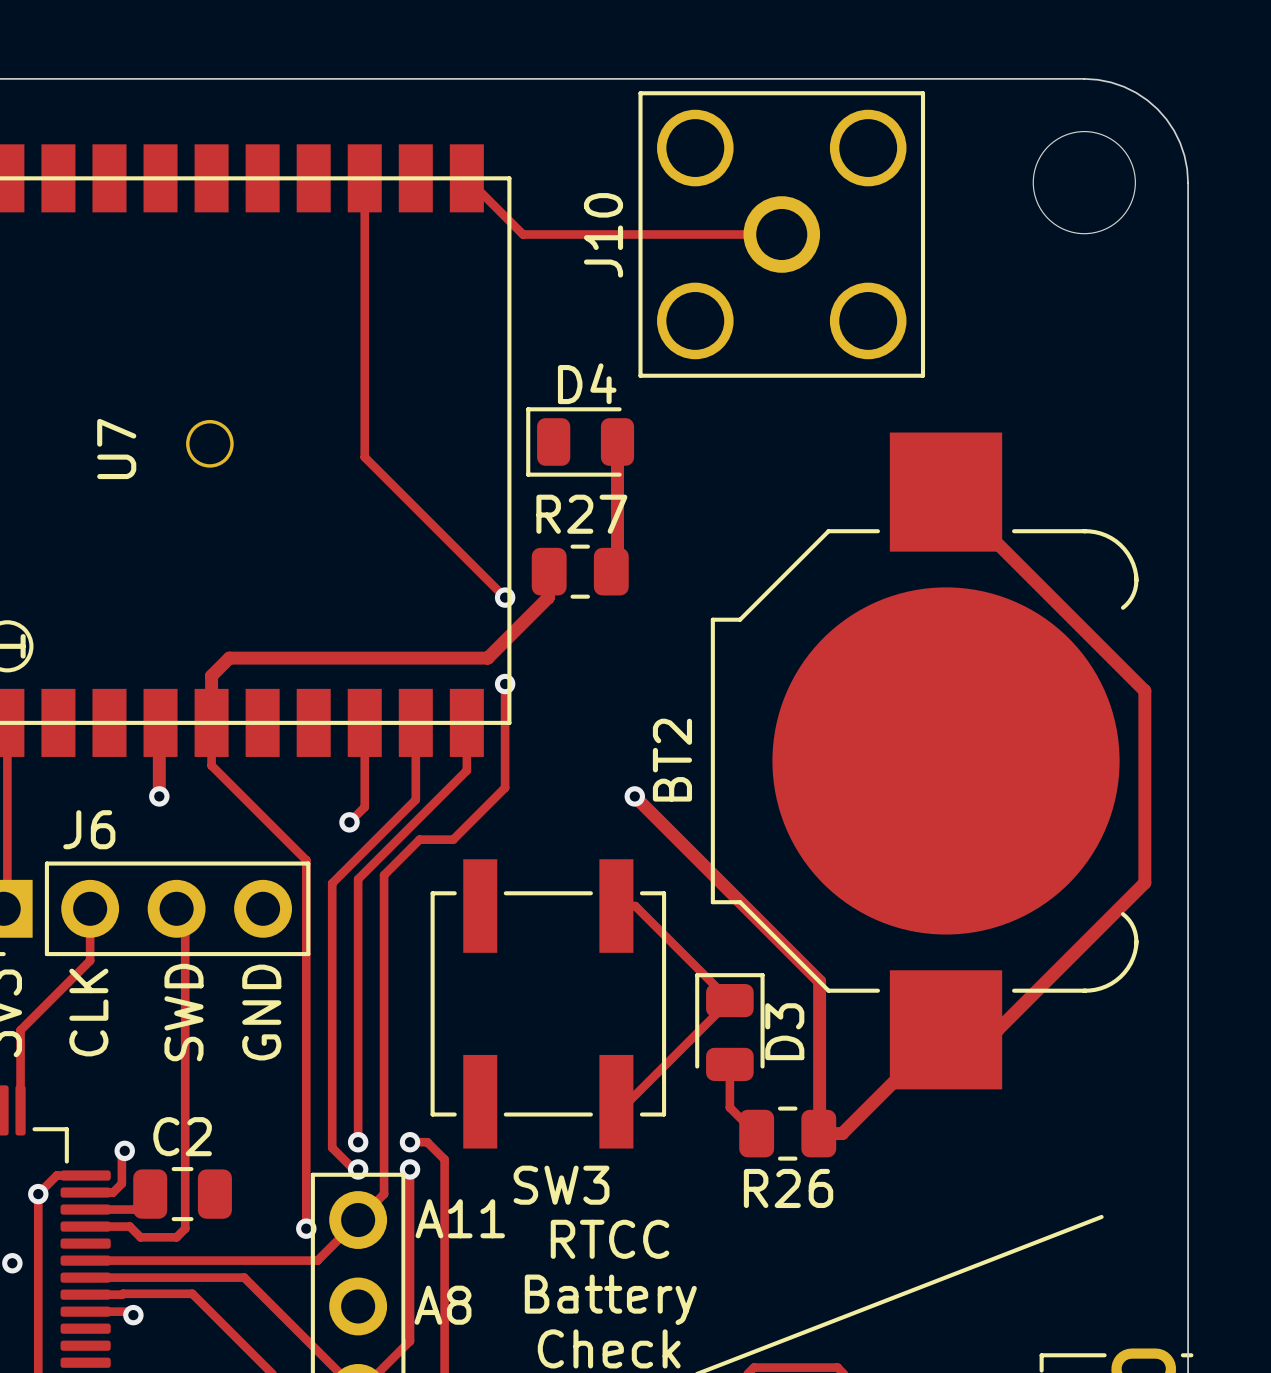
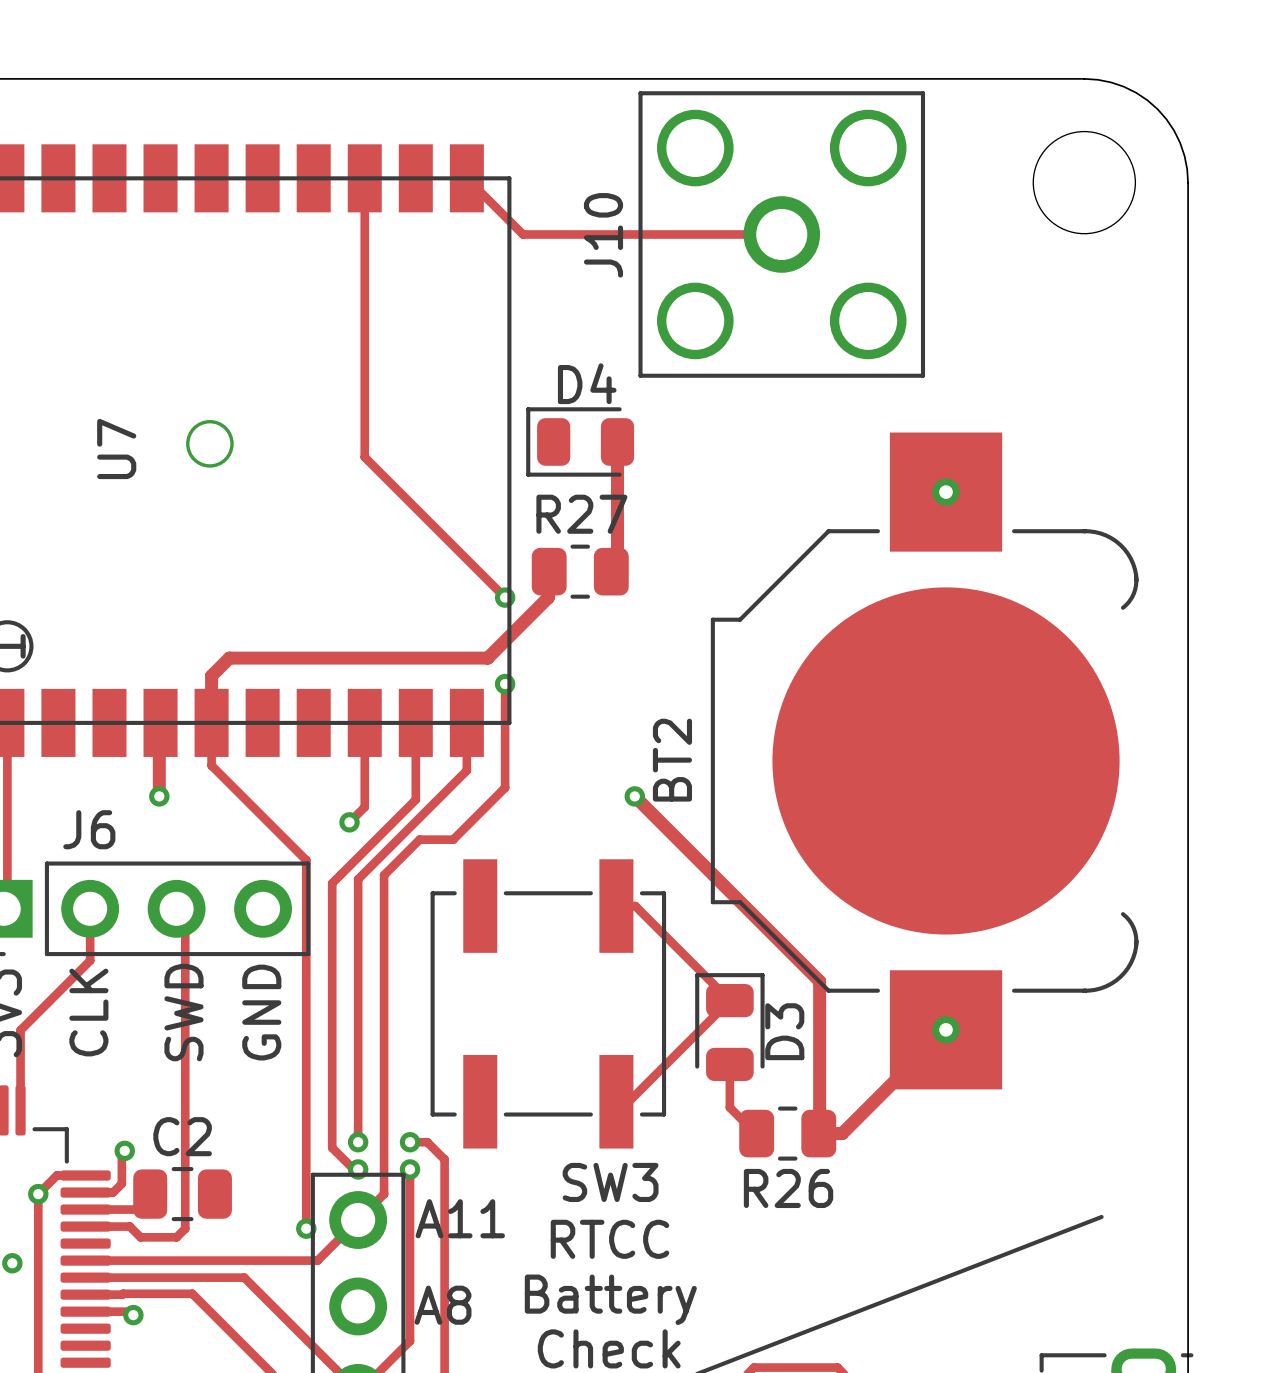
track: (946, 492) (1144, 690) (1144, 882) (997, 1029) (946, 1029) -> none
via: none -> (946, 492)
via: none -> (946, 1029)
SW3 name position: SW3 (561, 1185) -> SW3 (610, 1182)

